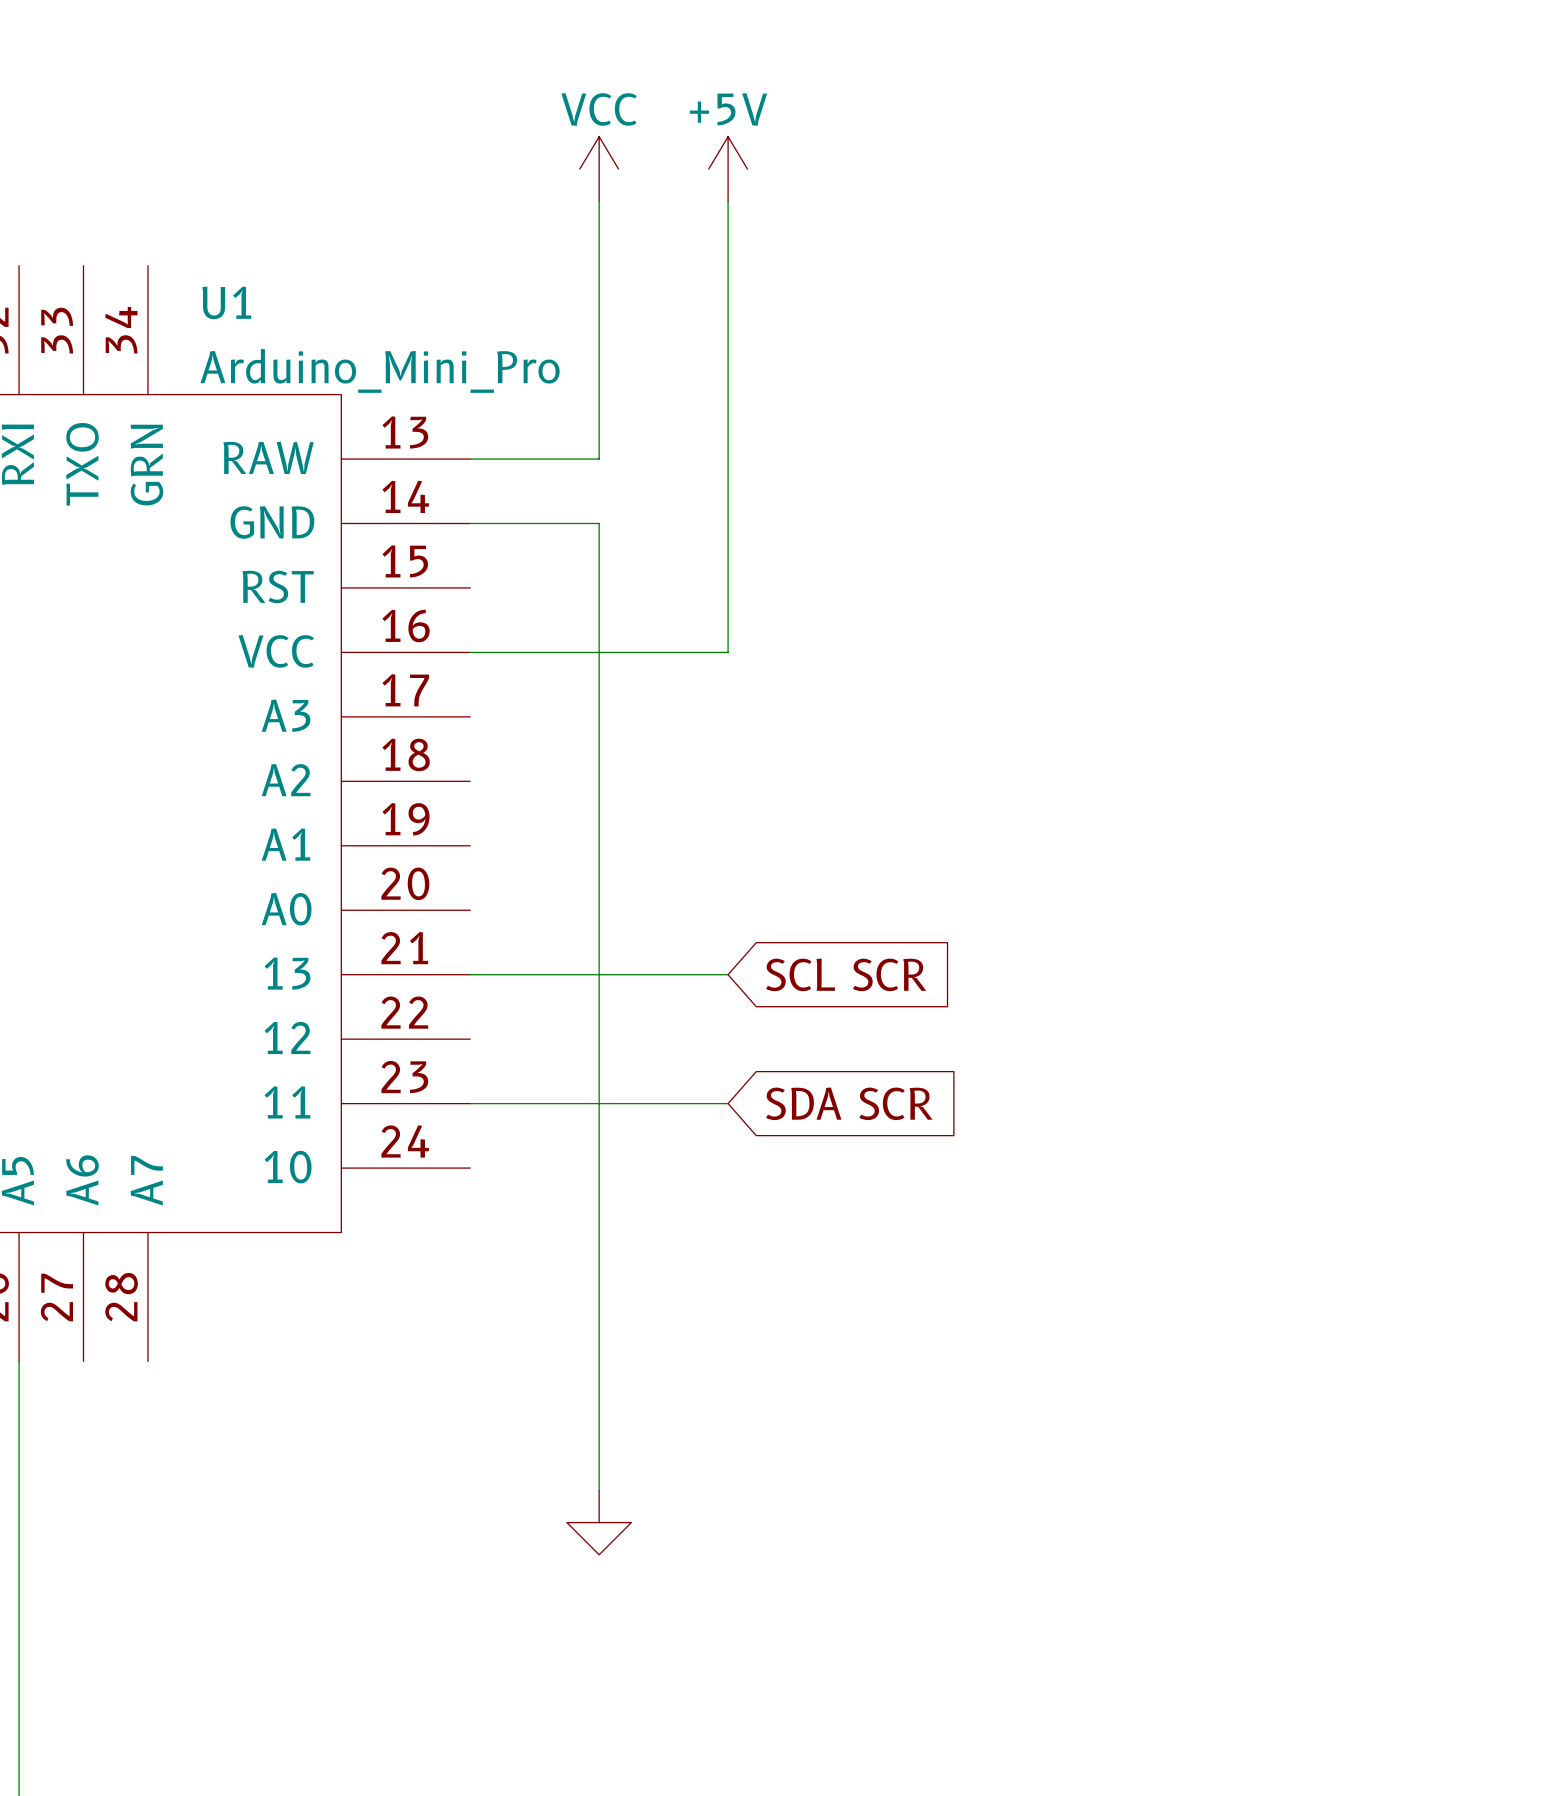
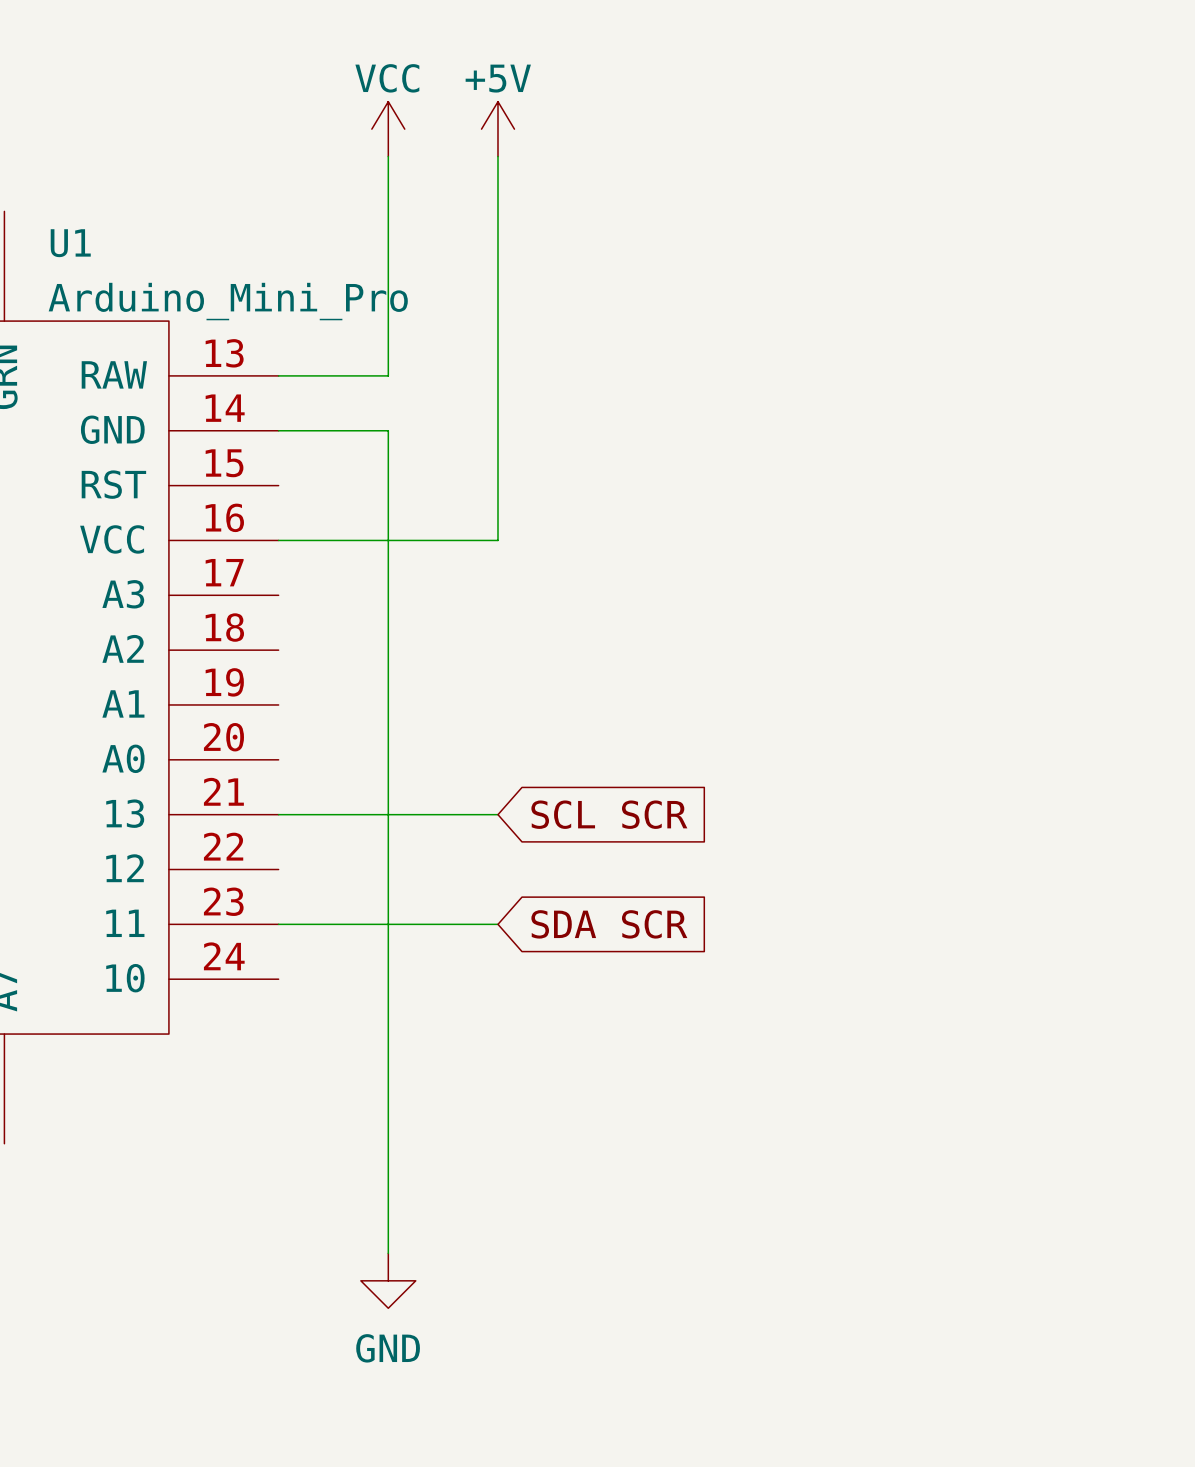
power symbol text: none -> GND (388, 1348)

